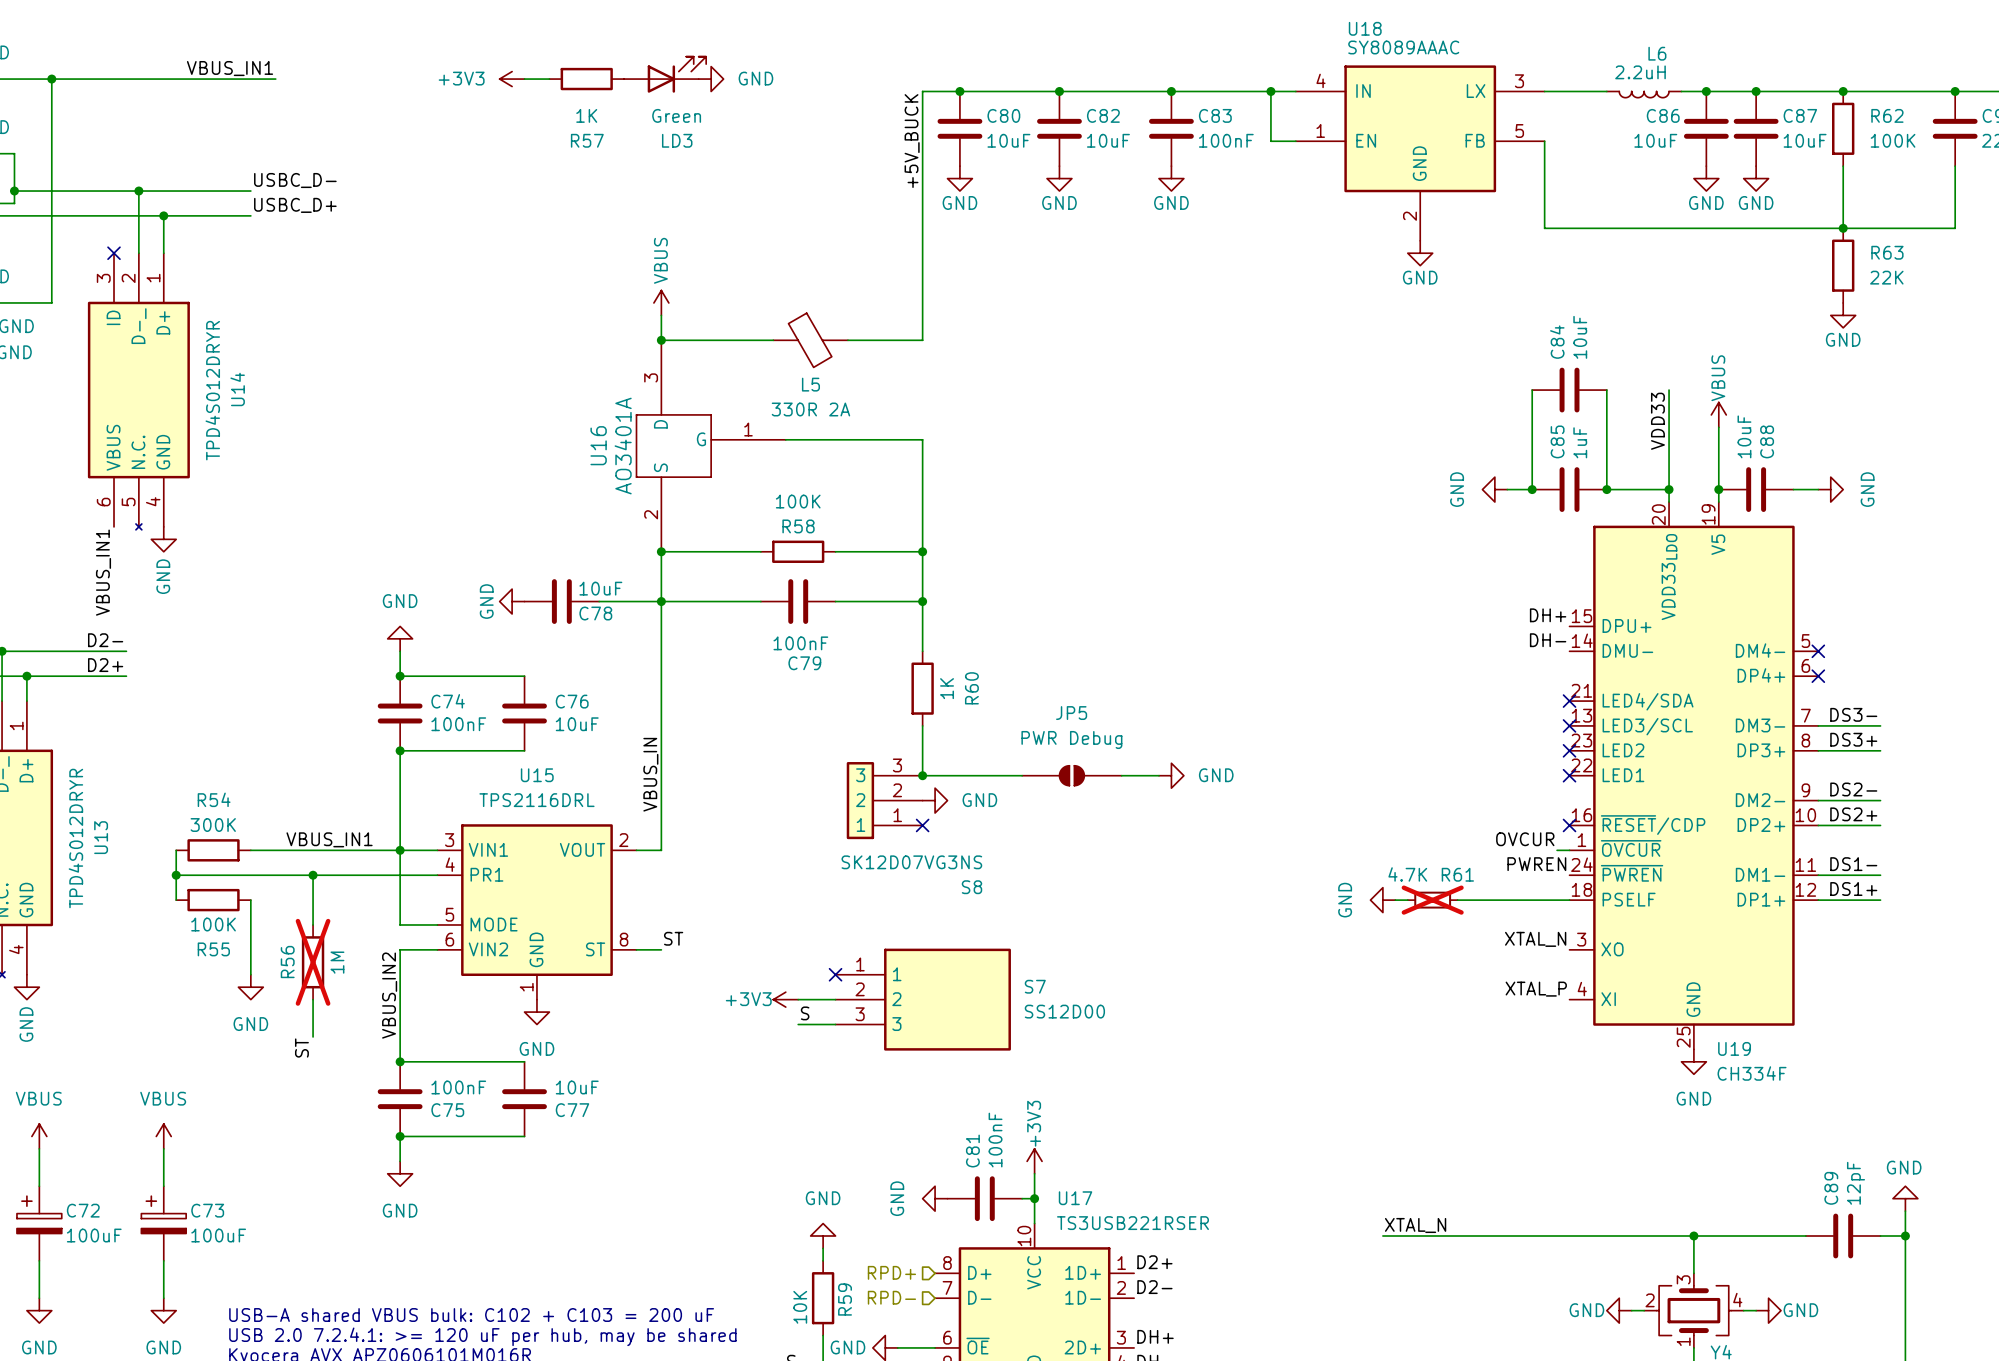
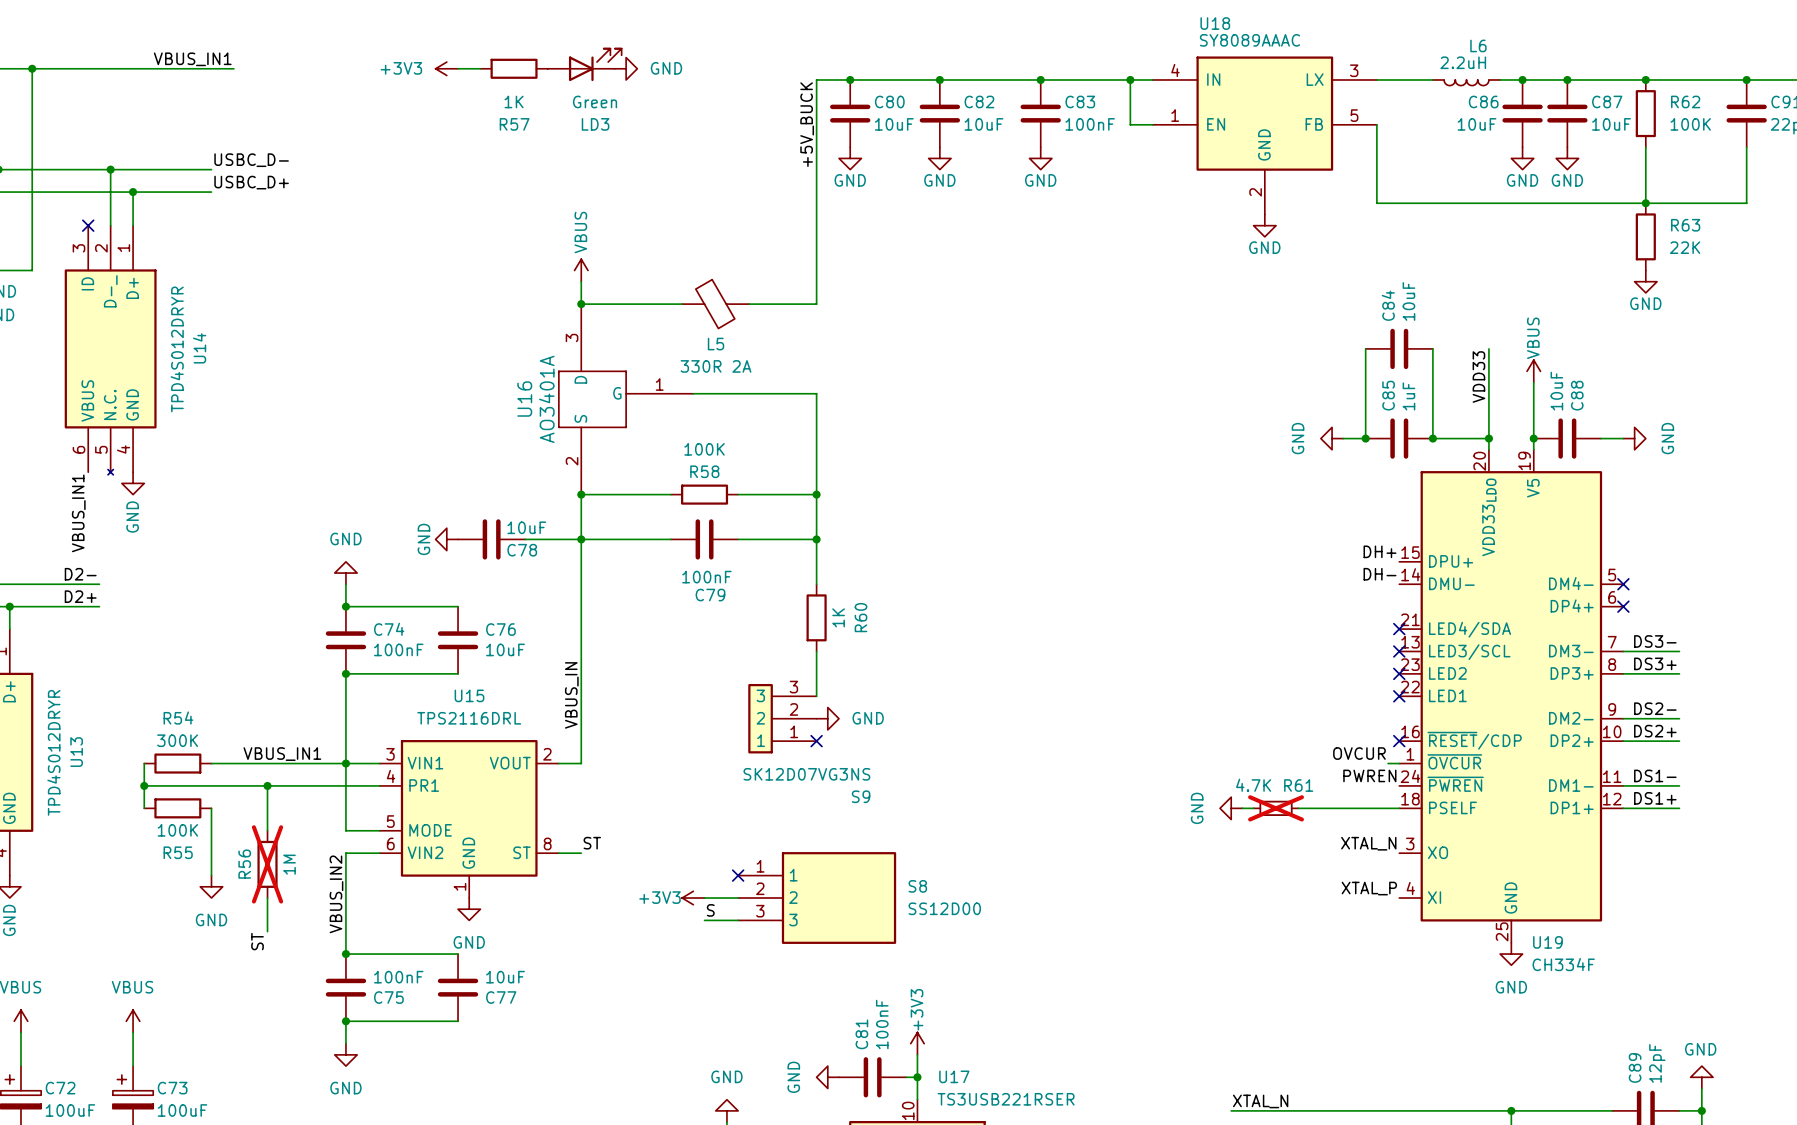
wire: (922, 775) (1022, 775) -> none
junction: (922, 775) -> none
JP5: PWR Debug (1071, 775) -> none
wire: (1121, 775) (1158, 775) -> none
power symbol: GND (1171, 775) -> none
S8 name: S8 (971, 887) -> S9 (861, 796)
S7 name: S7 (1035, 986) -> S8 (917, 886)

